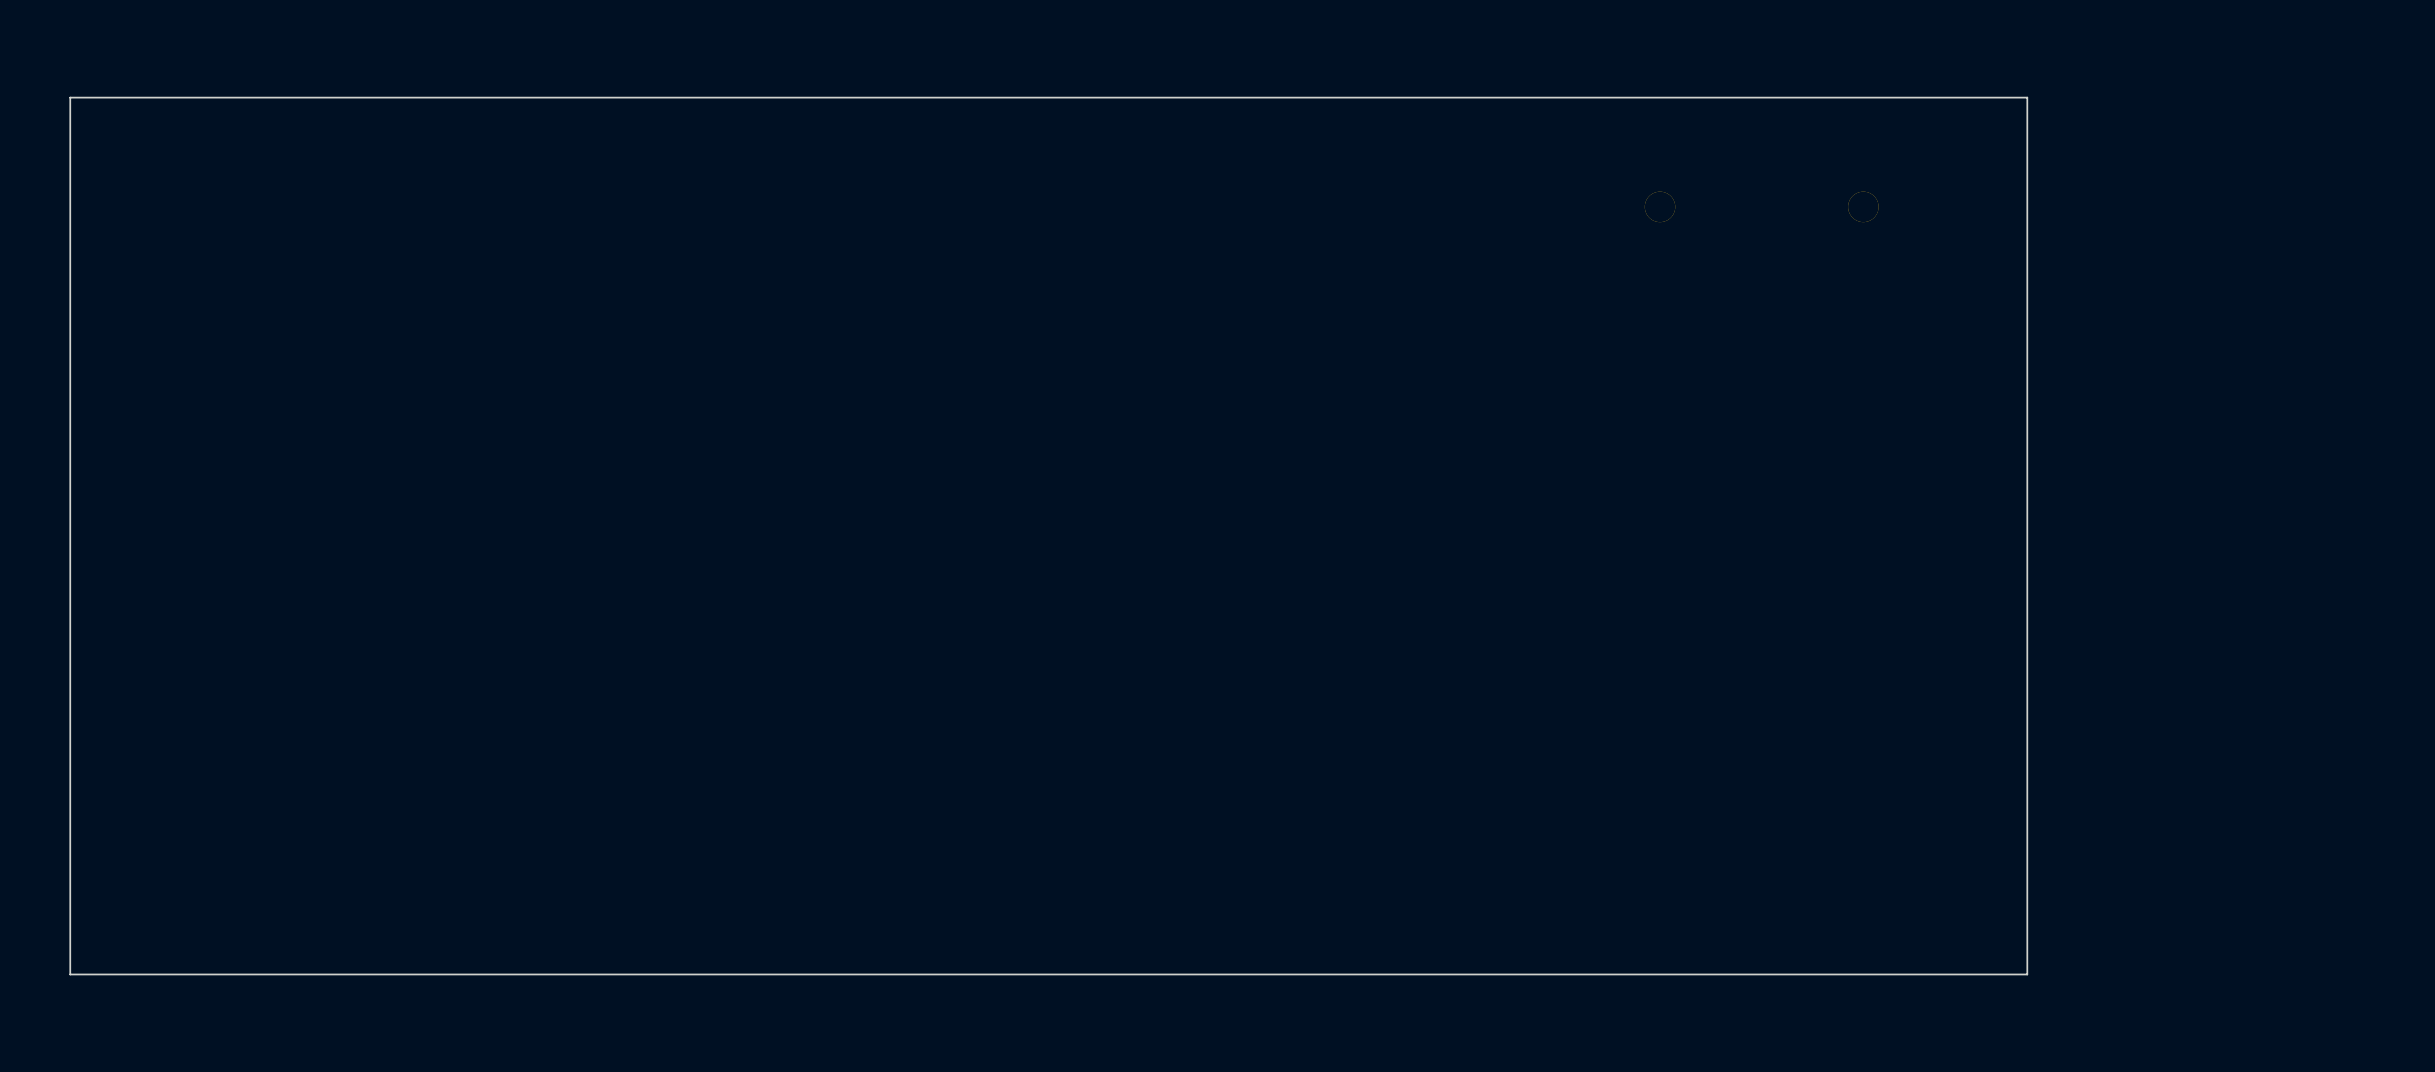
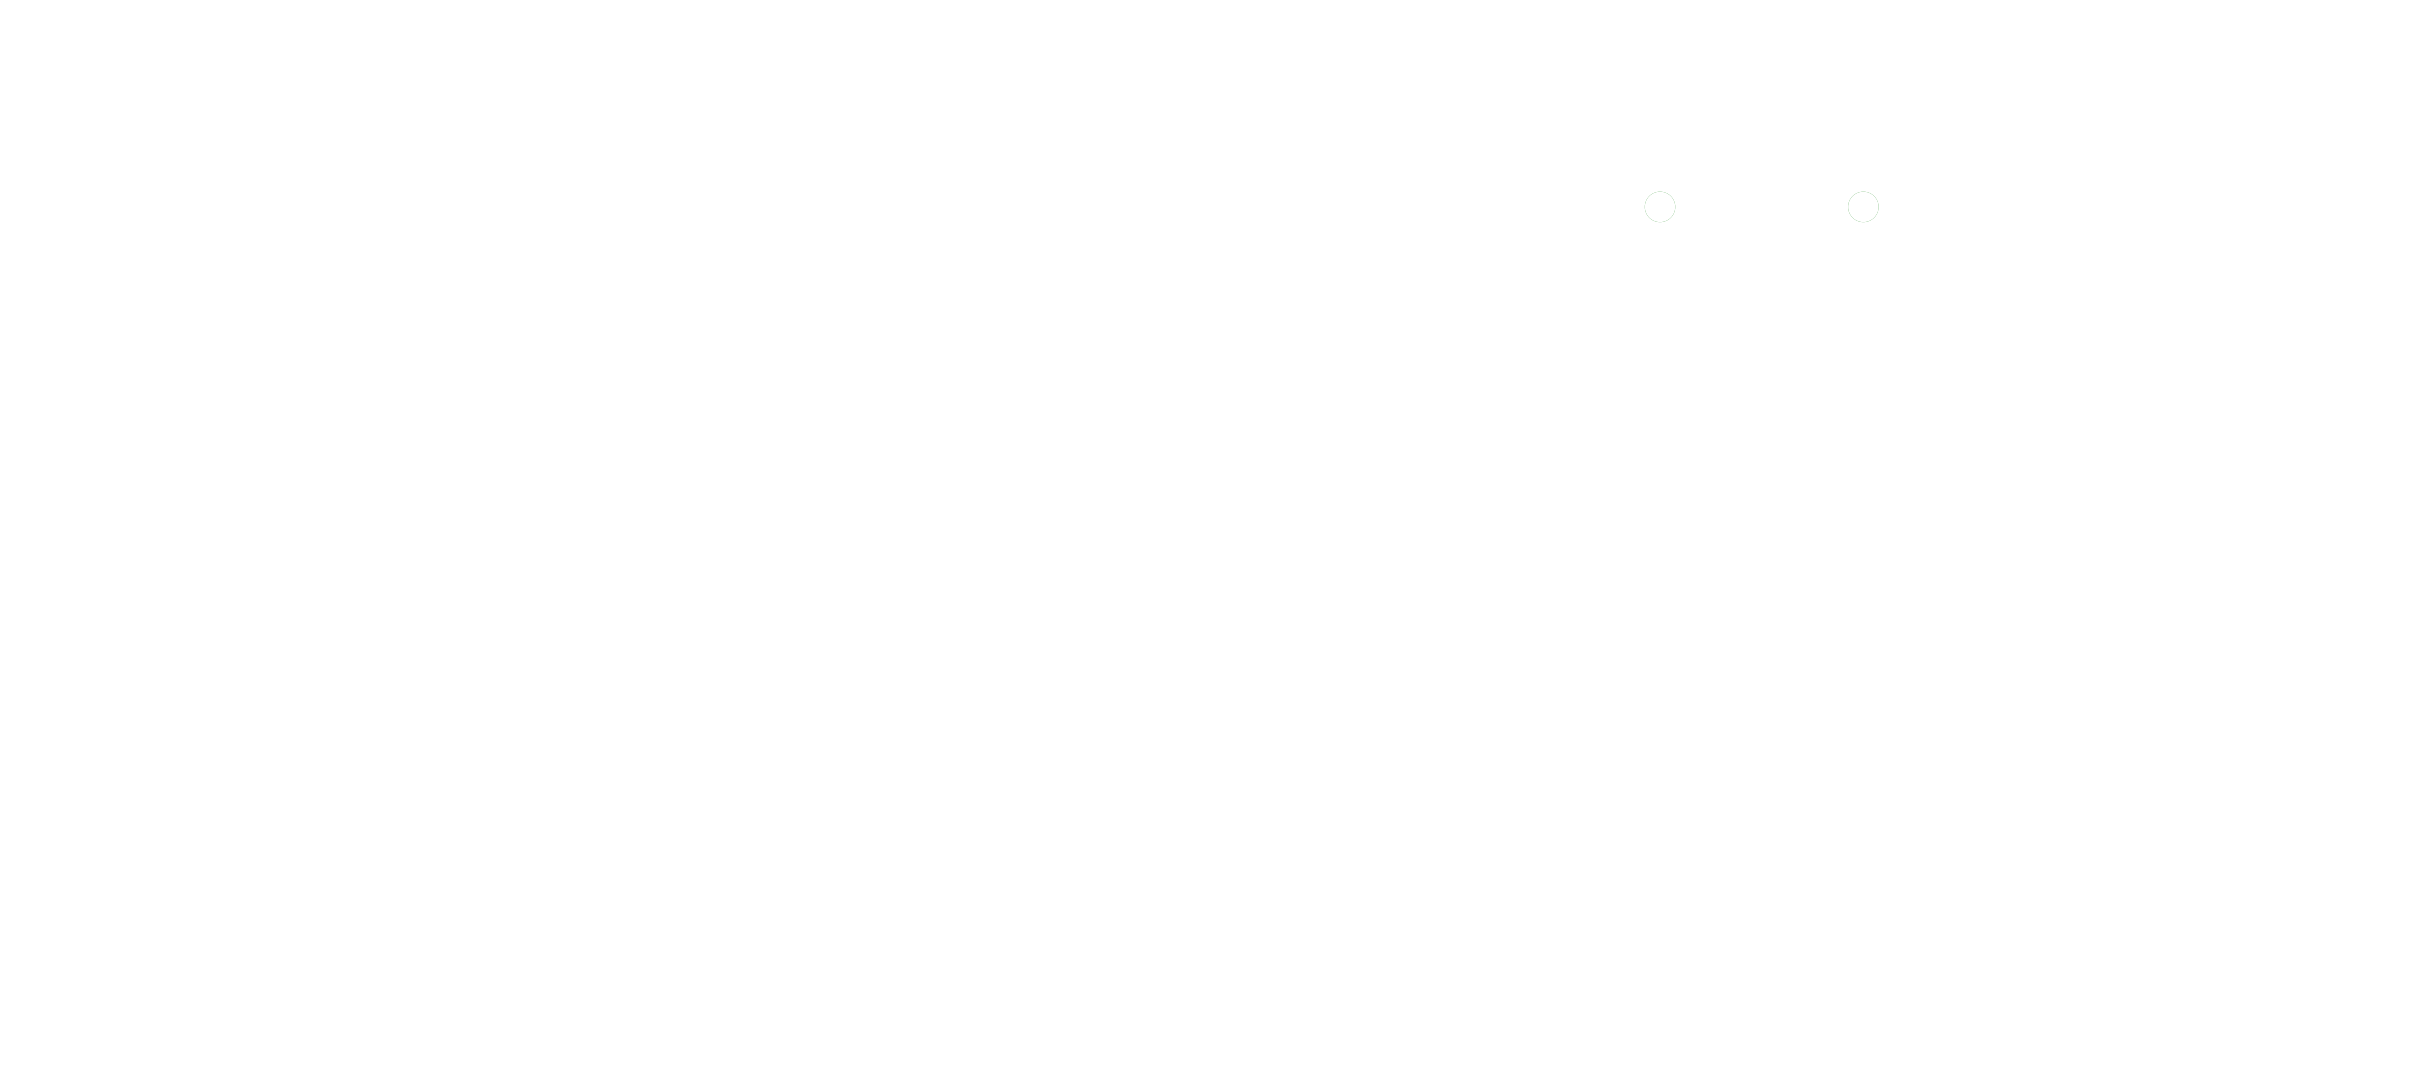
board edge: (2027, 97) (70, 97) (70, 974) (2027, 974) (2027, 97) -> none

